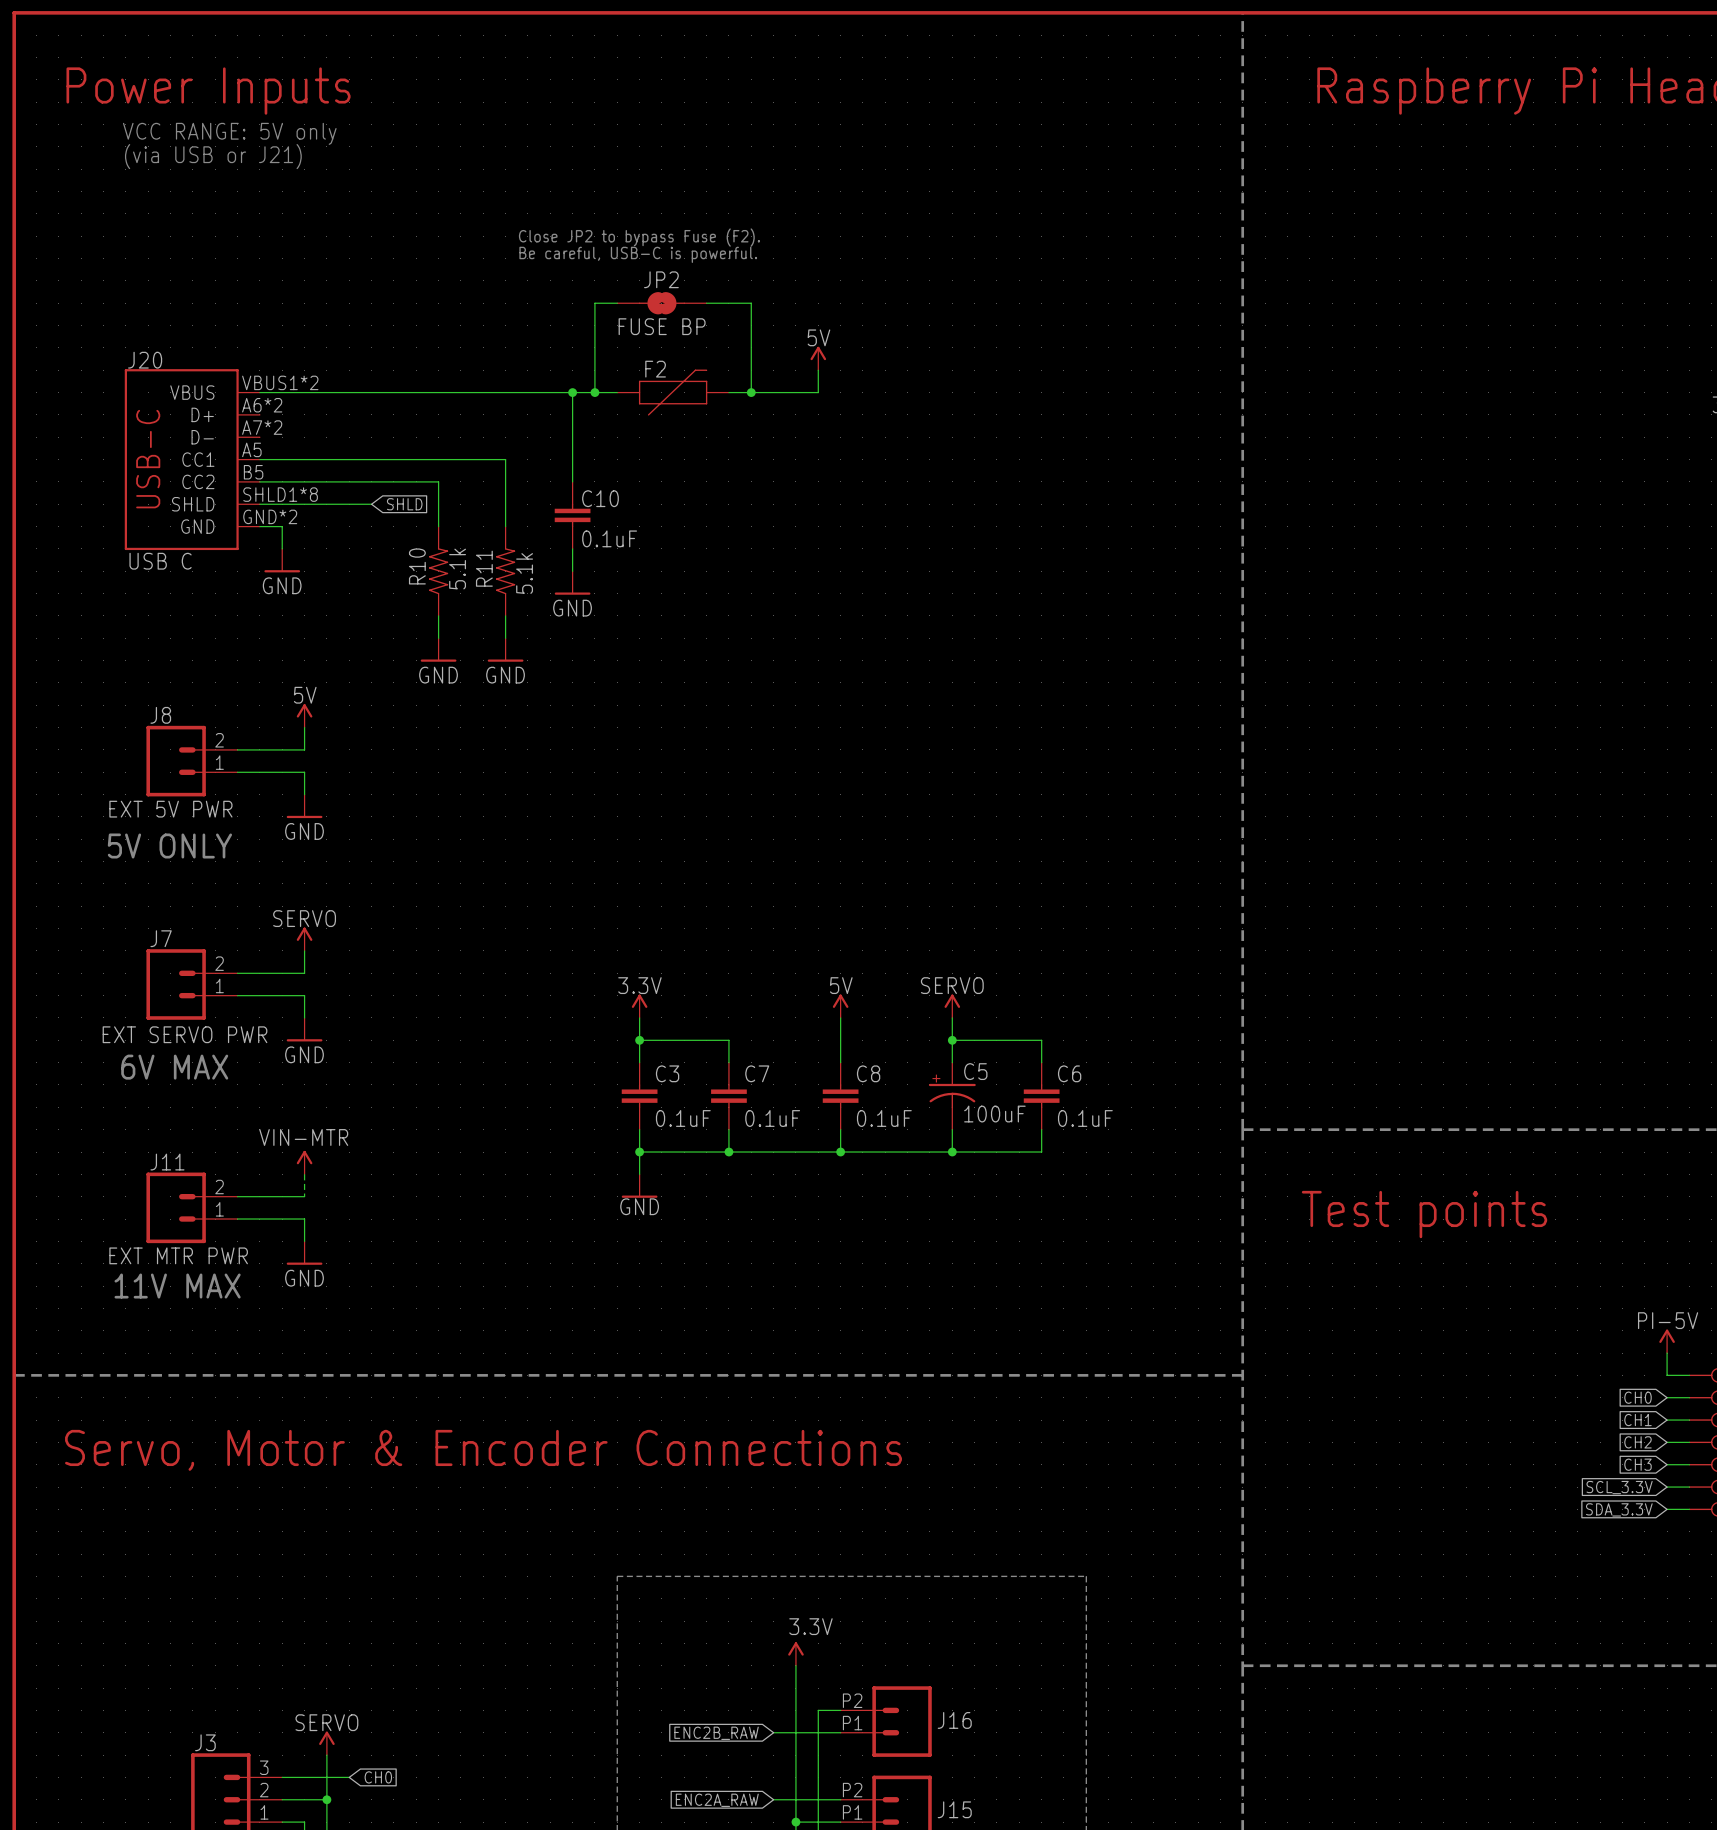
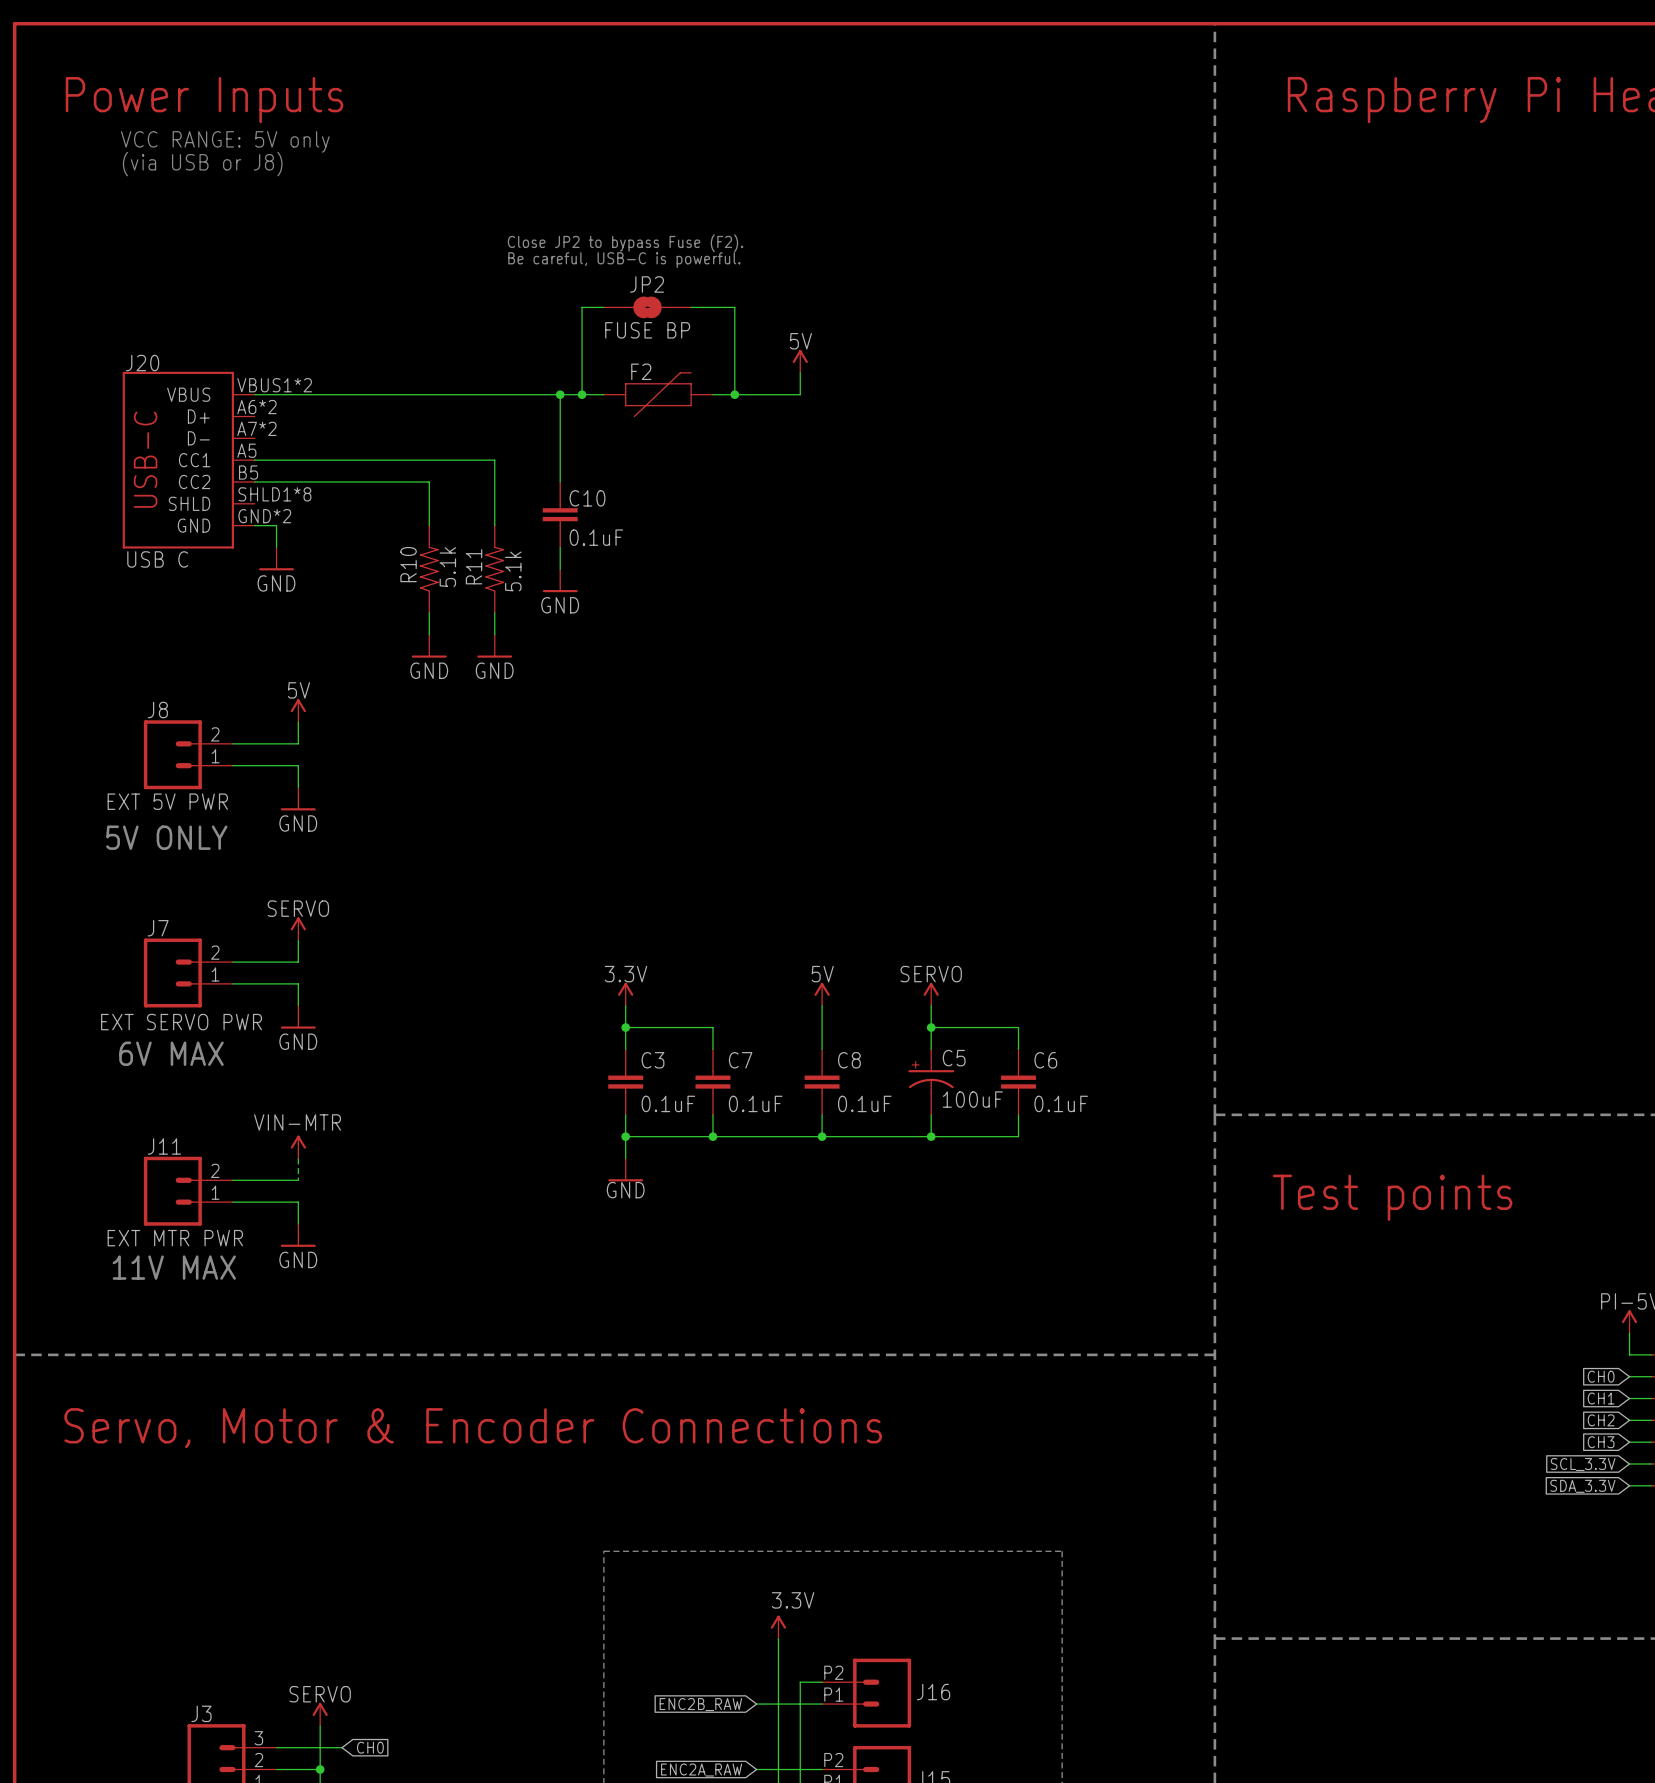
text: (via USB or J21) (213, 156) -> (via USB or J8) (202, 164)
wire: (259, 504) (371, 504) -> none
global label: SHLD (404, 504) -> none

